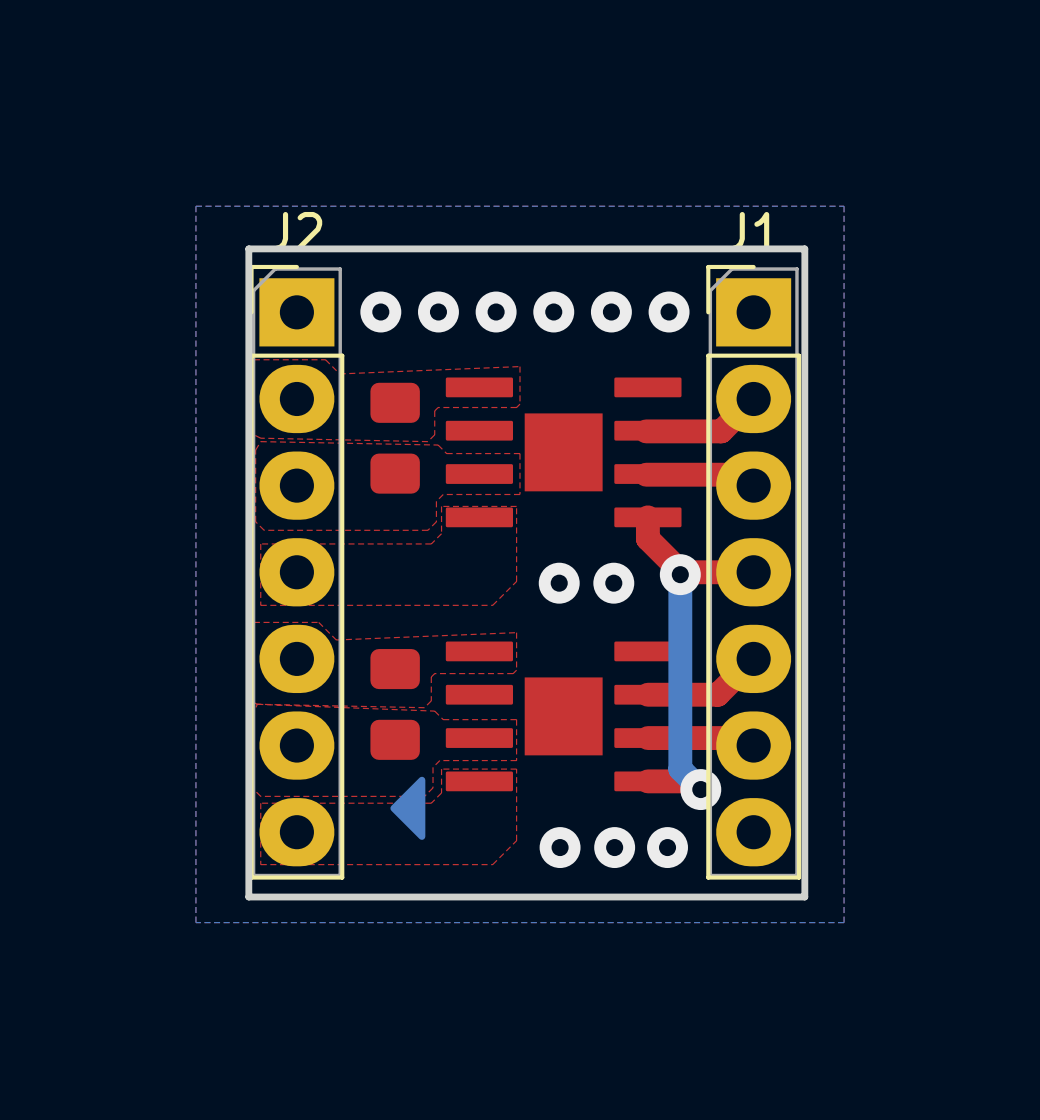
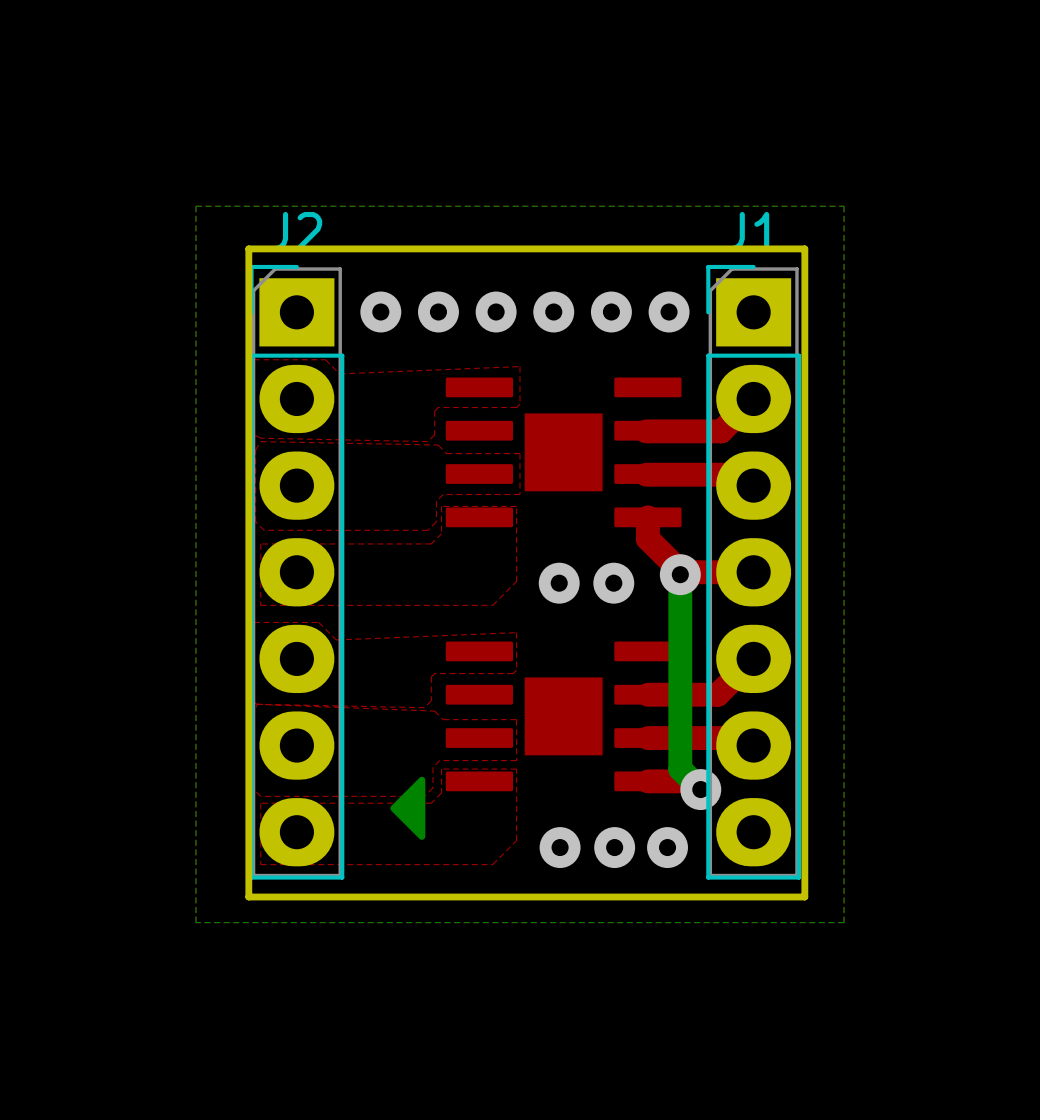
part: (395, 438) -> none
part: (395, 704) -> none

